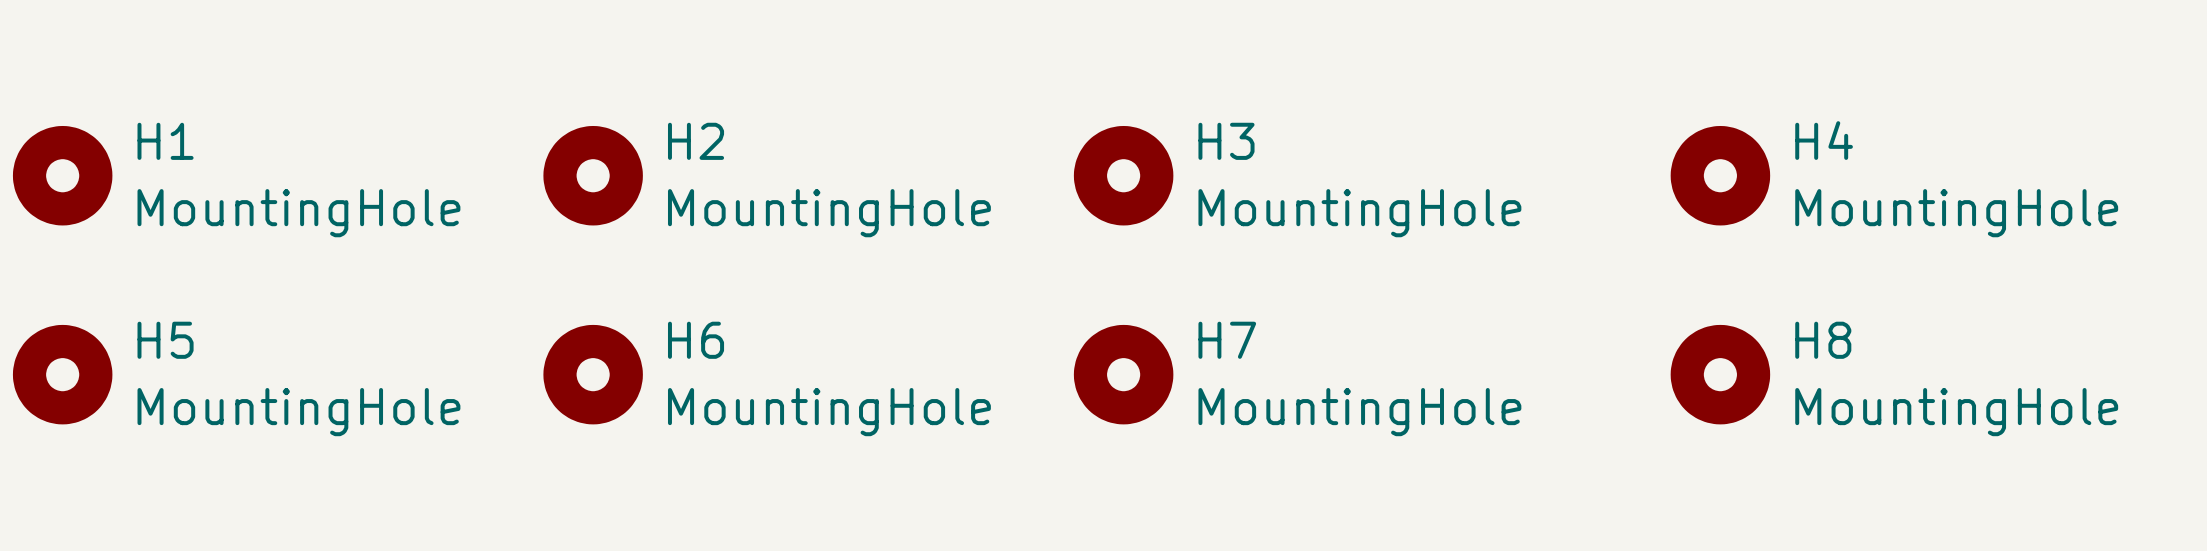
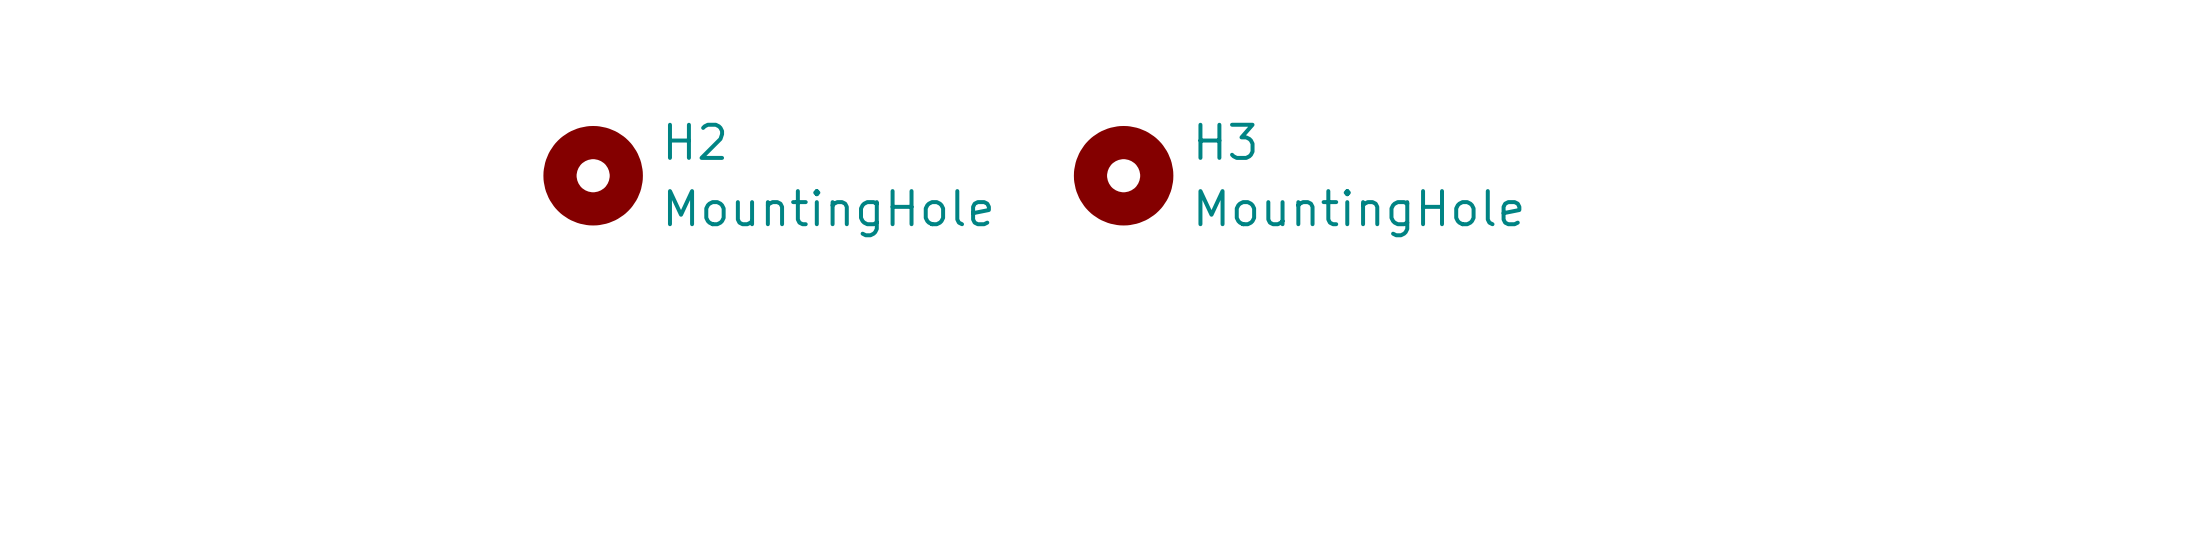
H1: MountingHole (62, 175) -> none
H4: MountingHole (1720, 175) -> none
H5: MountingHole (62, 374) -> none
H6: MountingHole (593, 374) -> none
H7: MountingHole (1123, 374) -> none
H8: MountingHole (1720, 374) -> none

